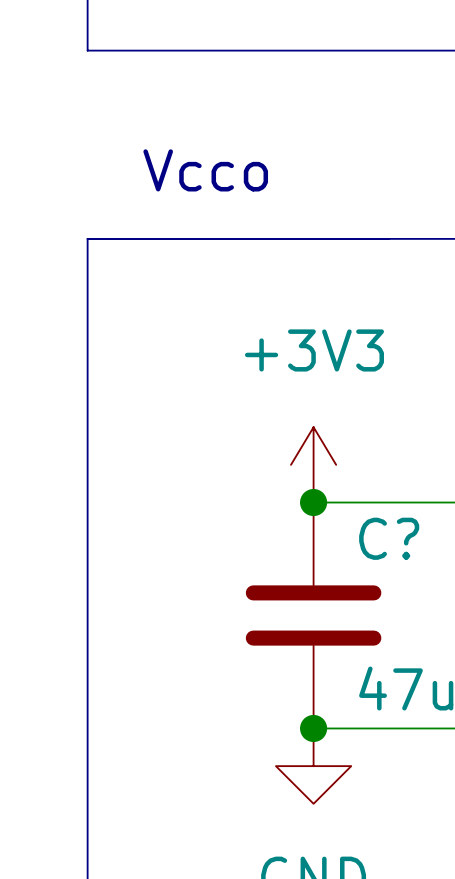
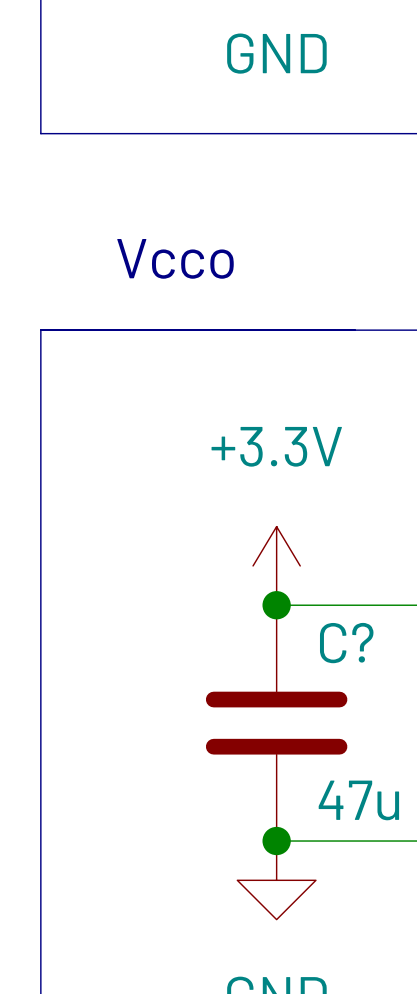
power symbol: +3V3 (313, 464) -> +3.3V (276, 565)

